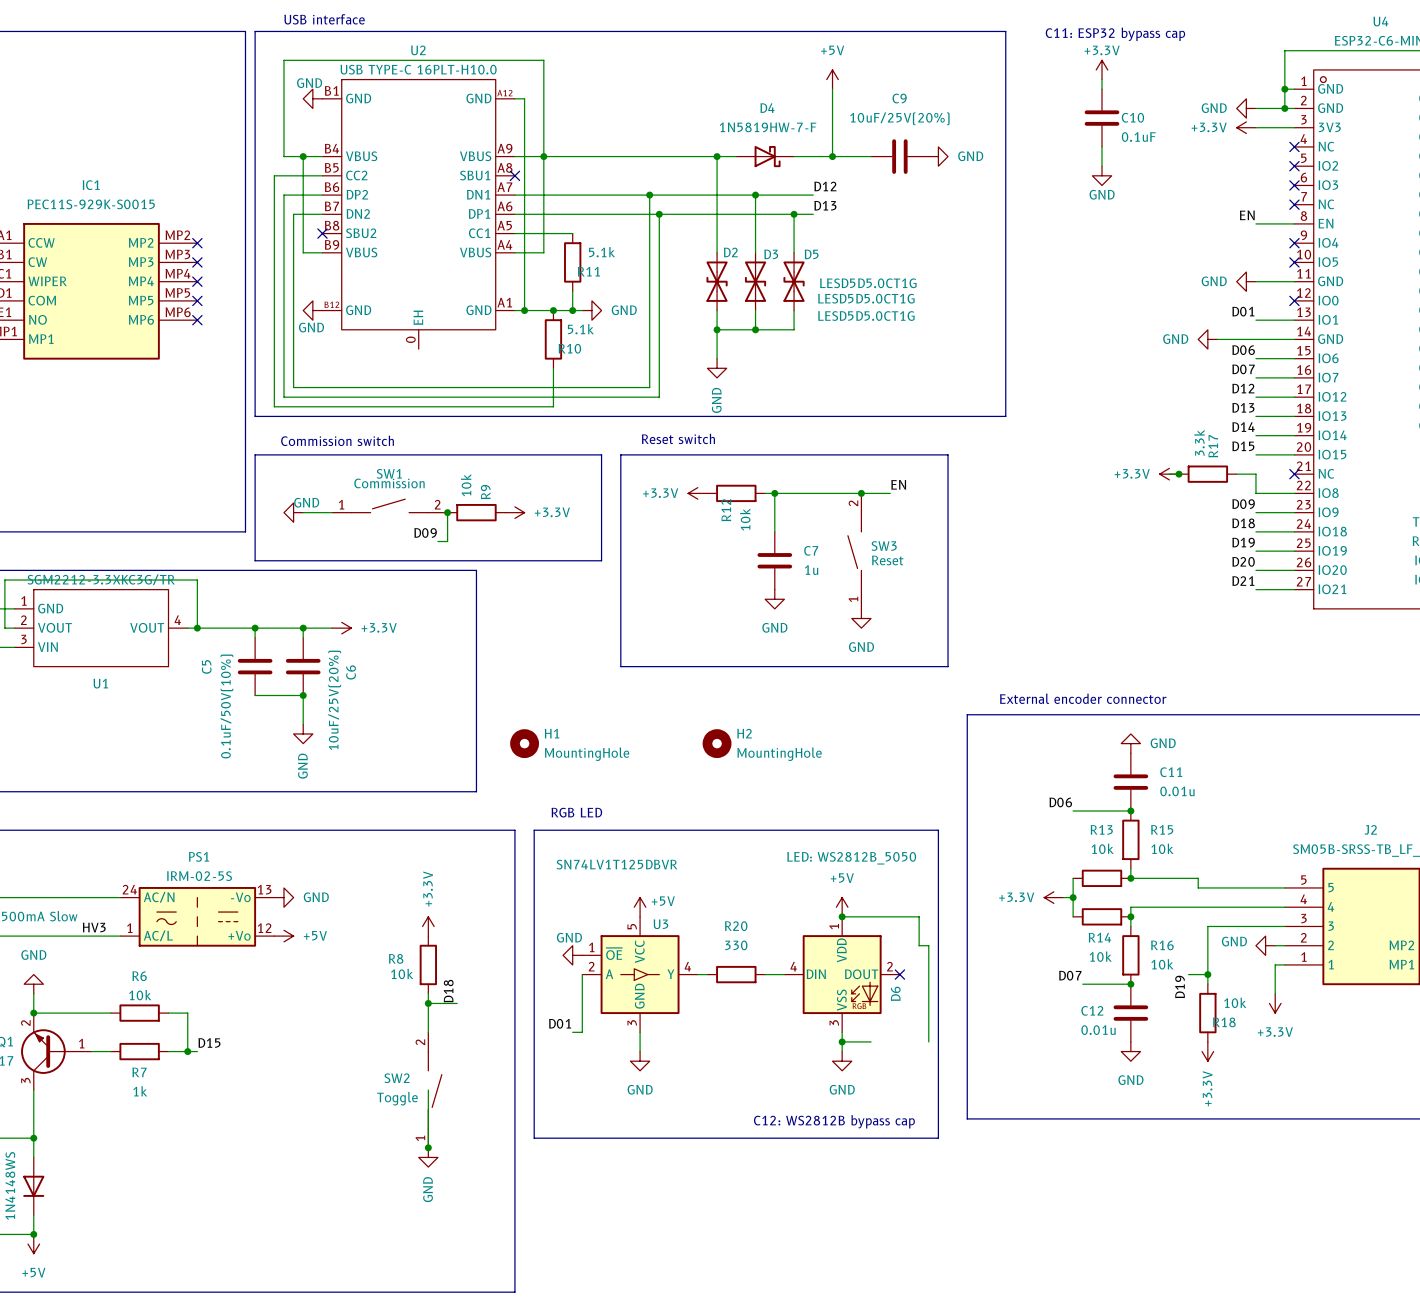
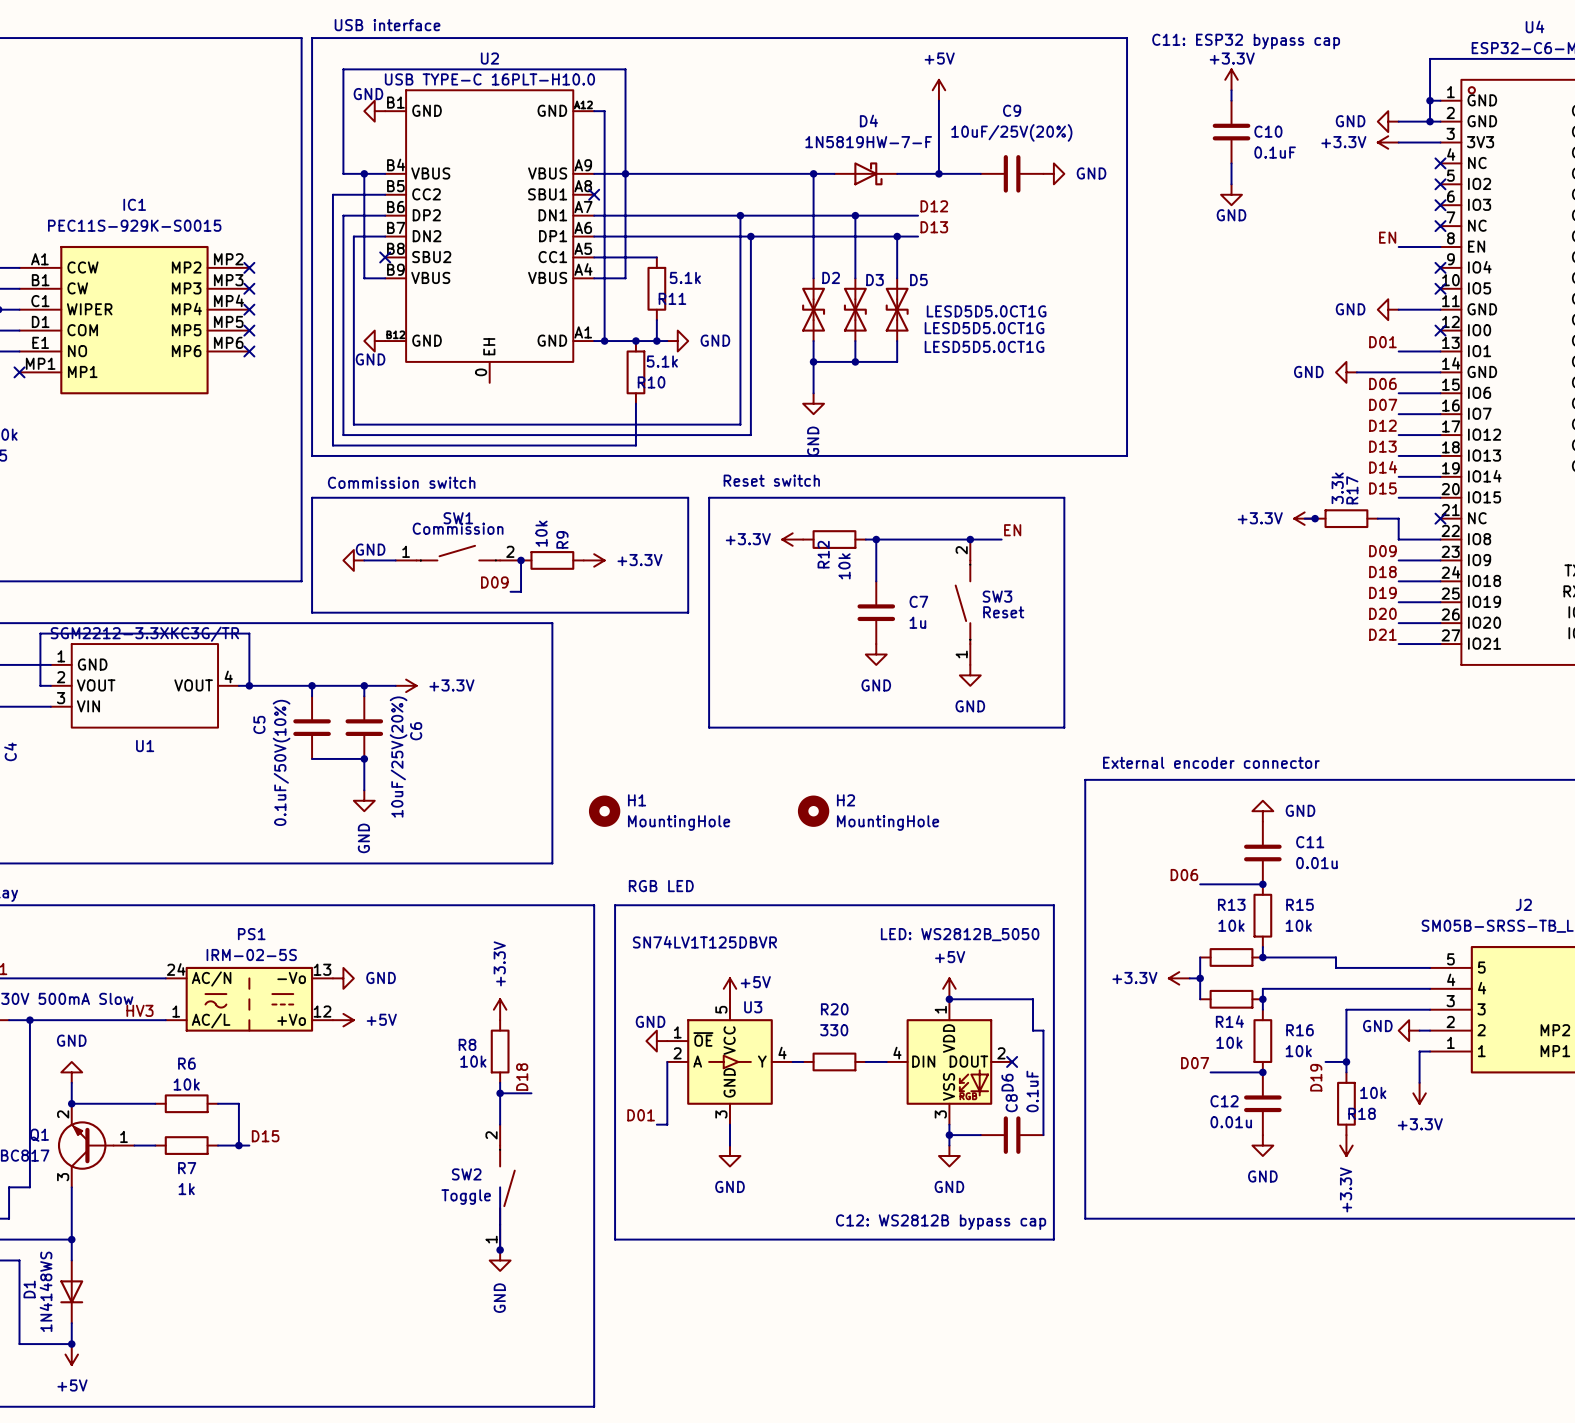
C8: none -> 0.1uF (1012, 1135)

